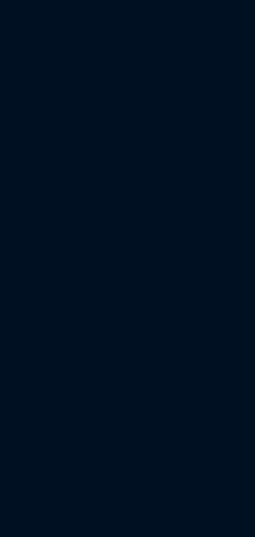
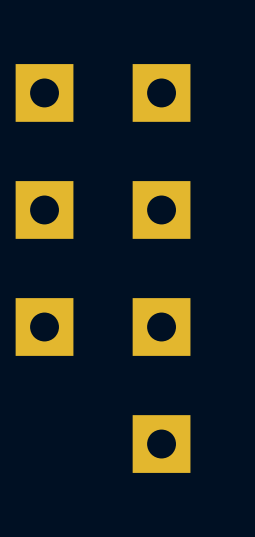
part: none -> (44, 92)
part: none -> (161, 92)
part: none -> (44, 209)
part: none -> (161, 209)
part: none -> (44, 327)
part: none -> (161, 327)
part: none -> (161, 444)

